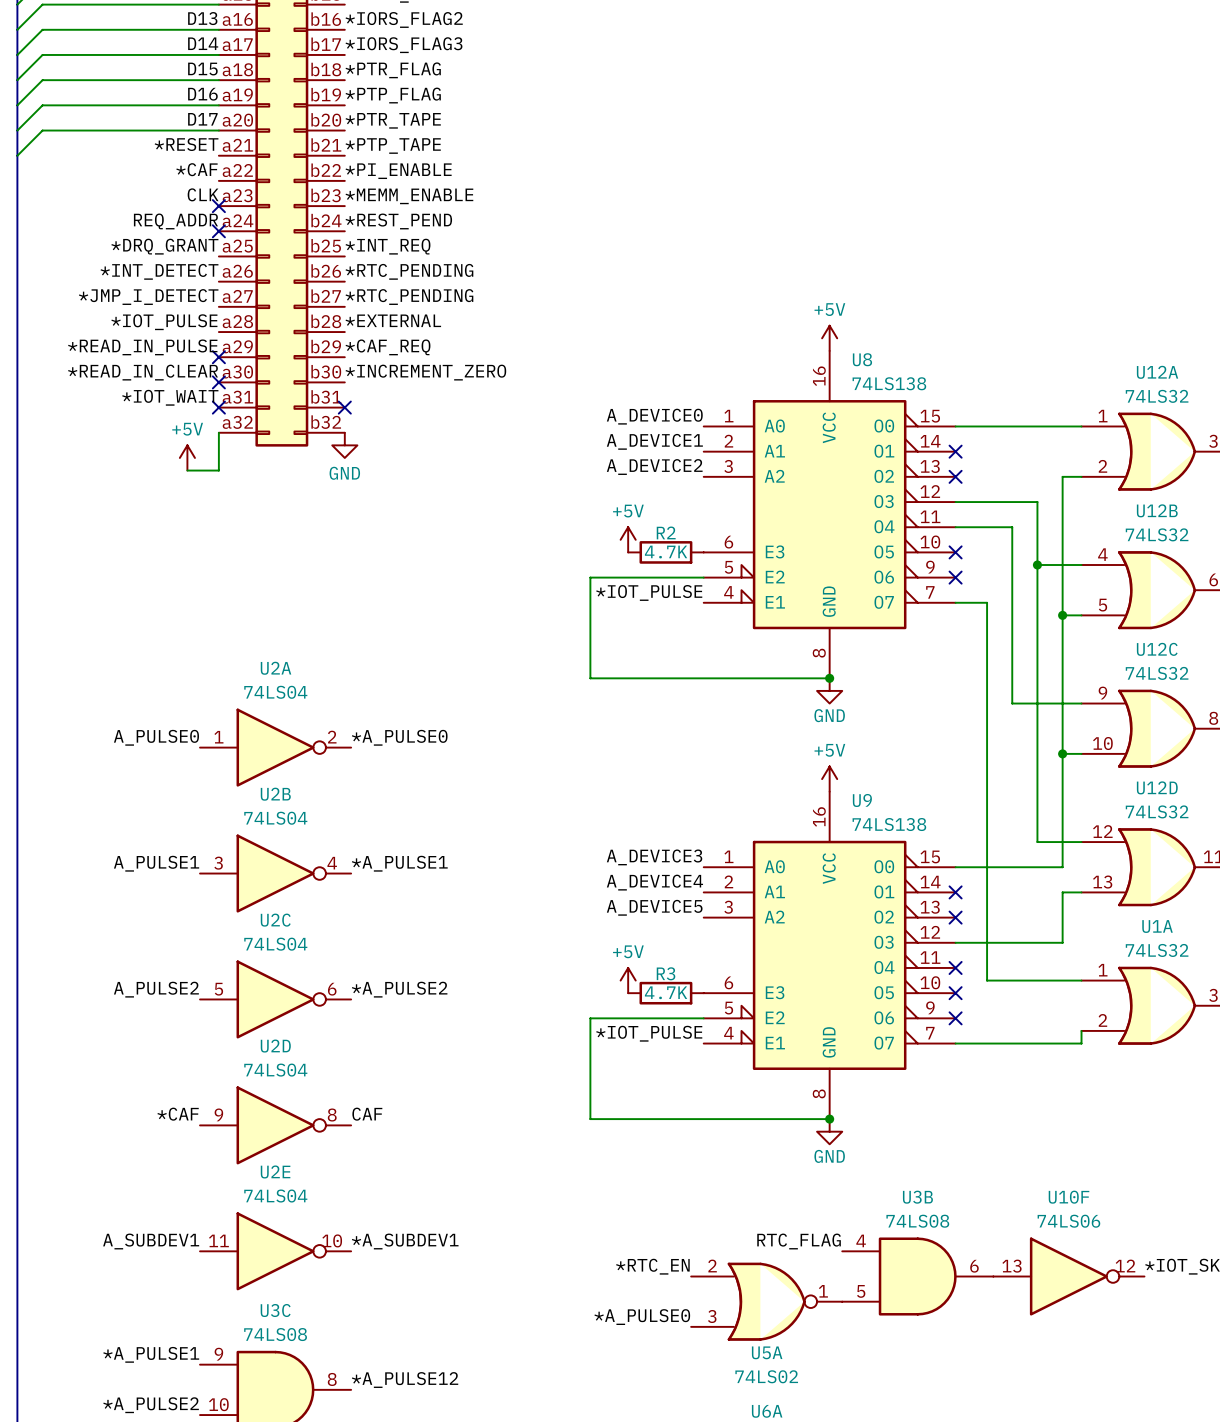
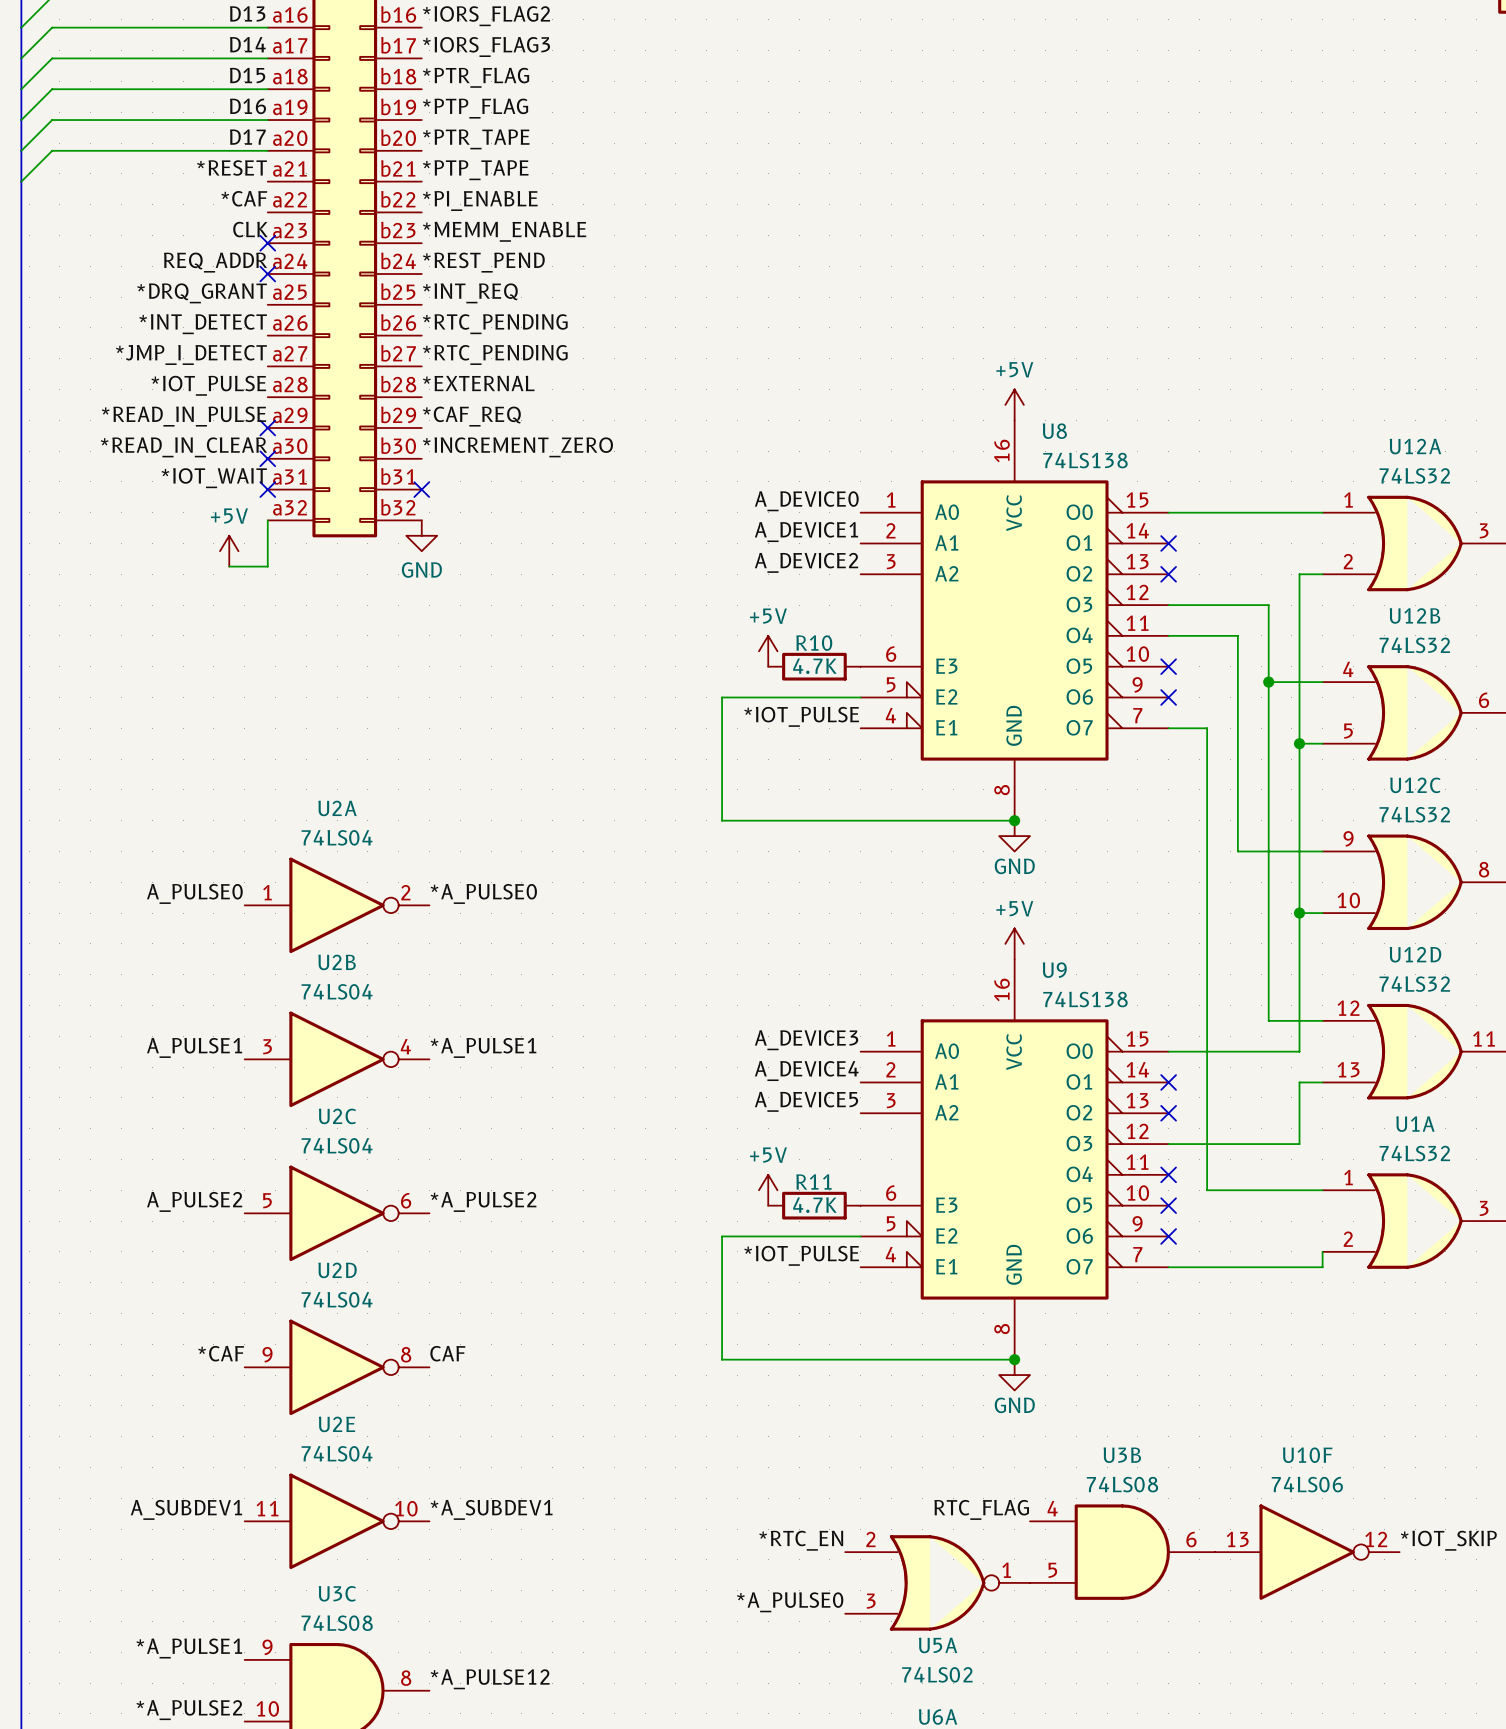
R2 name: R2 (666, 532) -> R10 (814, 643)
R3 name: R3 (666, 973) -> R11 (813, 1181)

